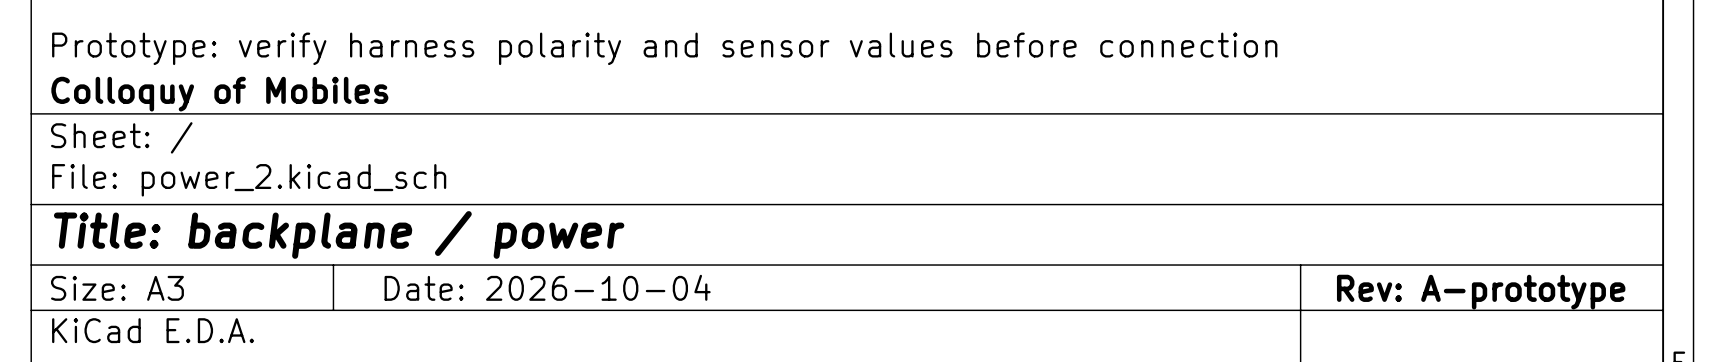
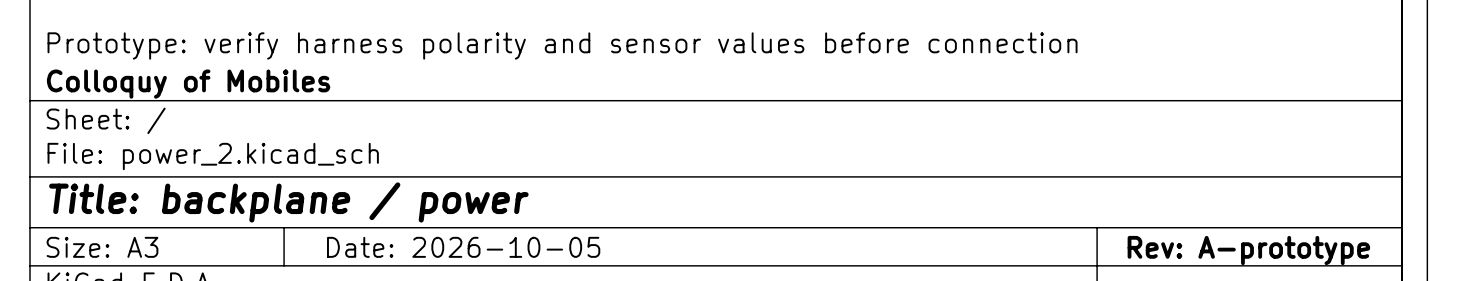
title block: Date: 2026-10-04 (547, 287) -> Date: 2026-10-05 (463, 247)

